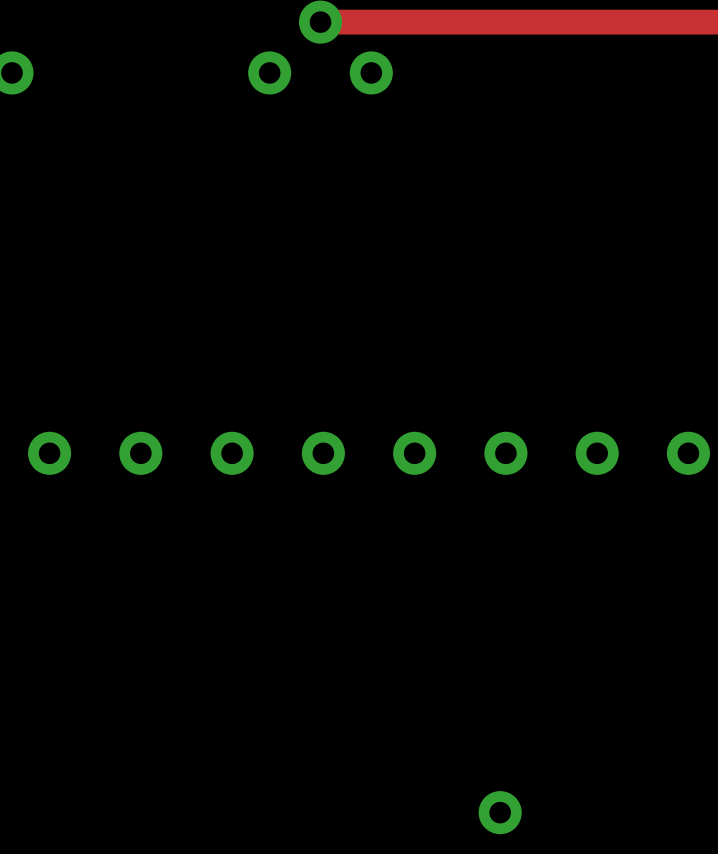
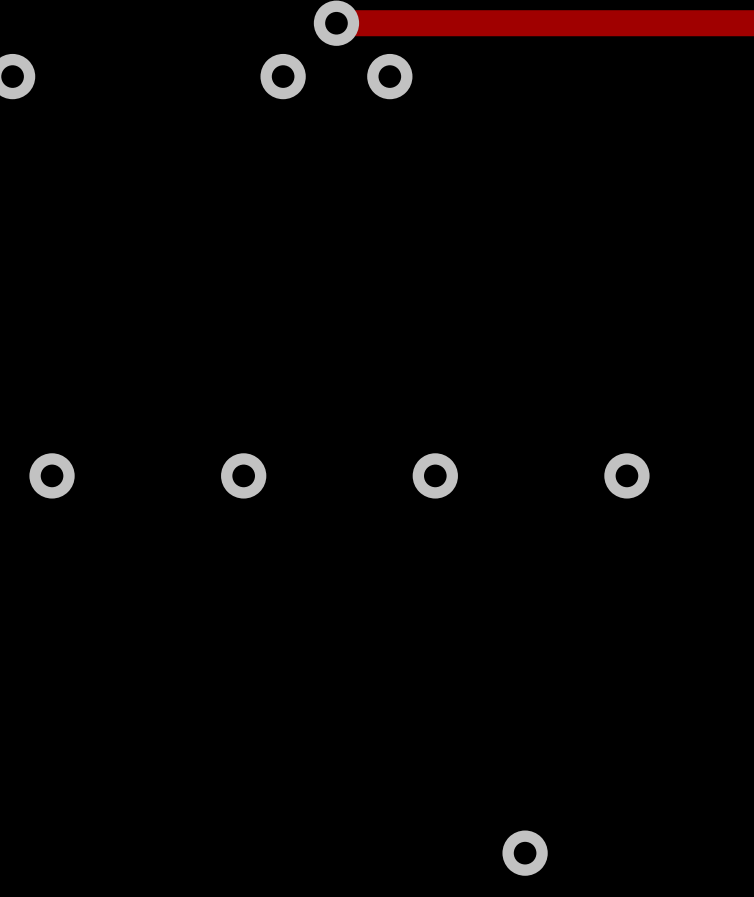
via: (140, 453) -> none
via: (323, 453) -> none
via: (505, 453) -> none
via: (688, 453) -> none

